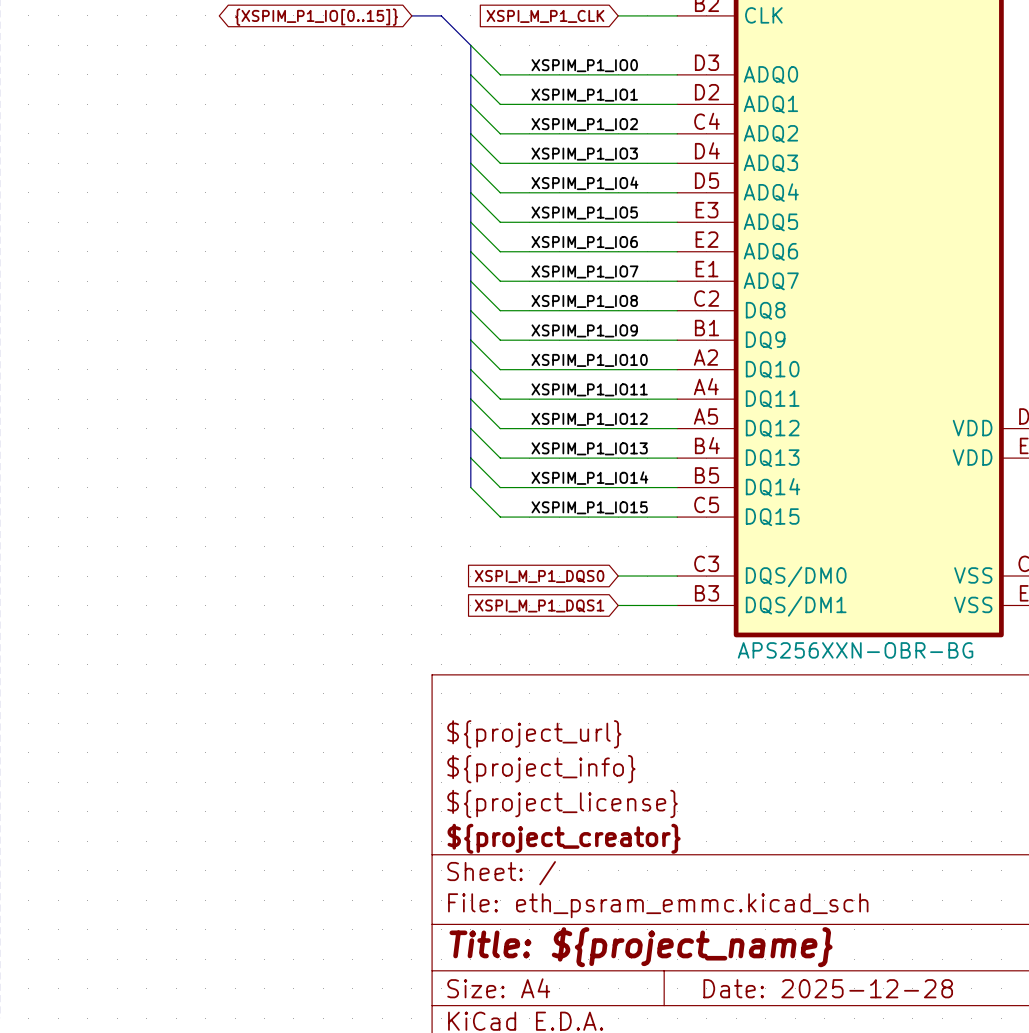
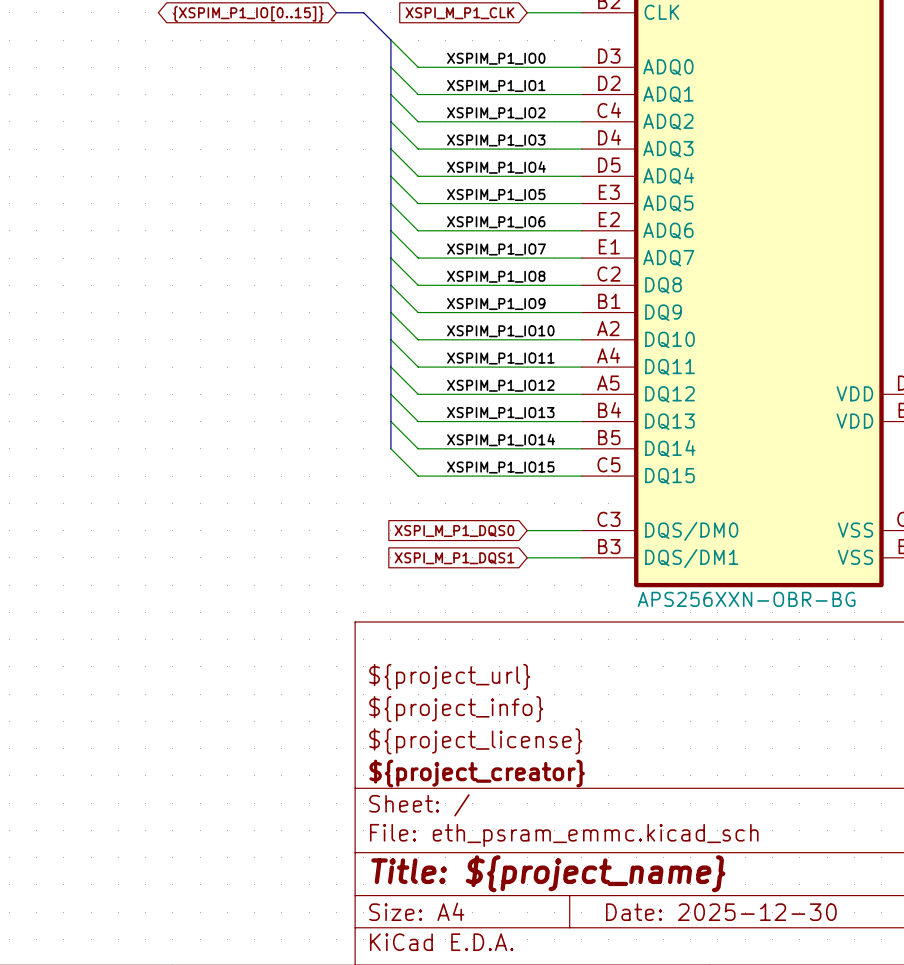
title block: Date: 2025-12-28 (828, 988) -> Date: 2025-12-30 (721, 912)

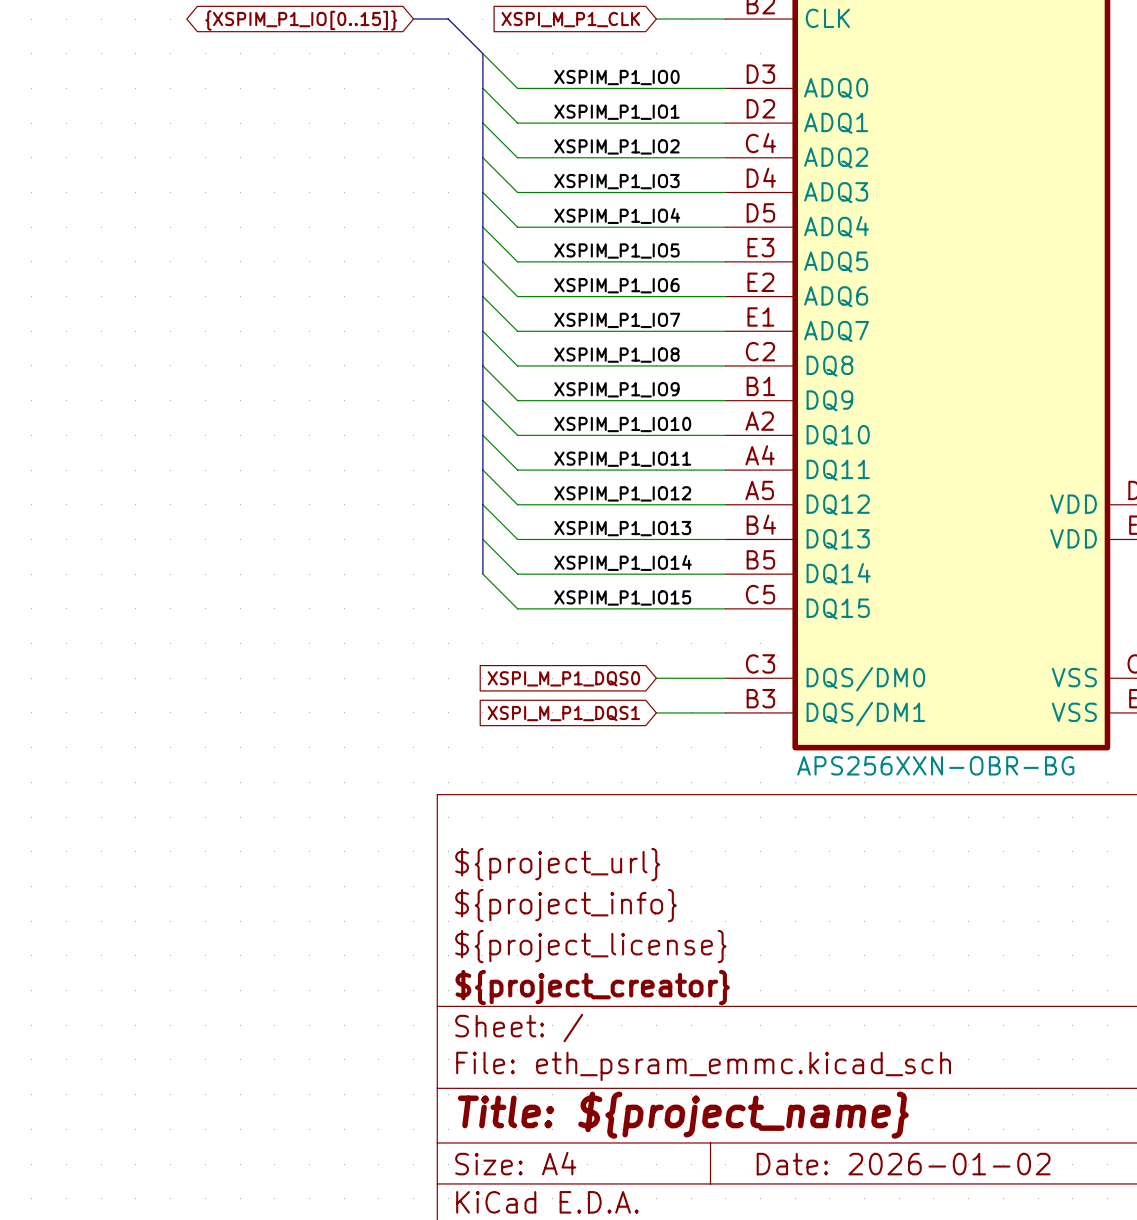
title block: Date: 2025-12-30 (721, 912) -> Date: 2026-01-02 (903, 1164)

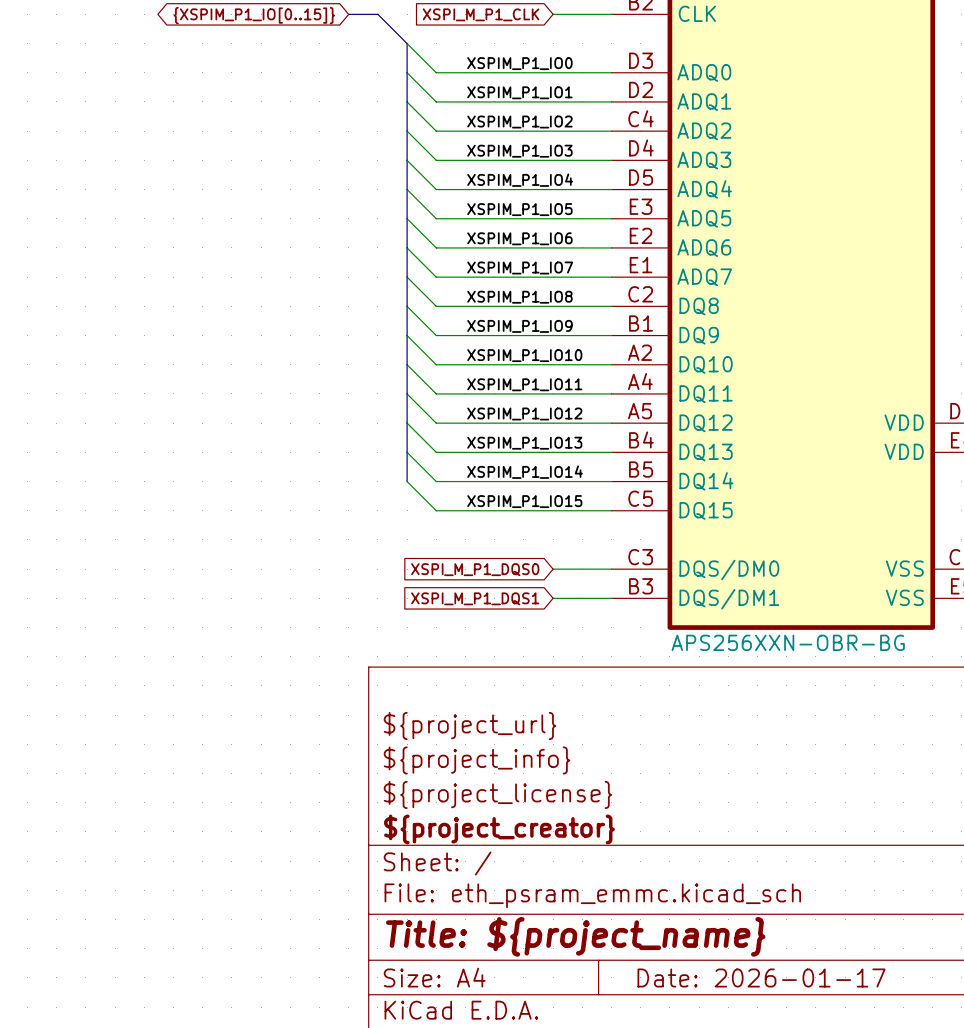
title block: Date: 2026-01-02 (903, 1164) -> Date: 2026-01-17 (761, 977)

